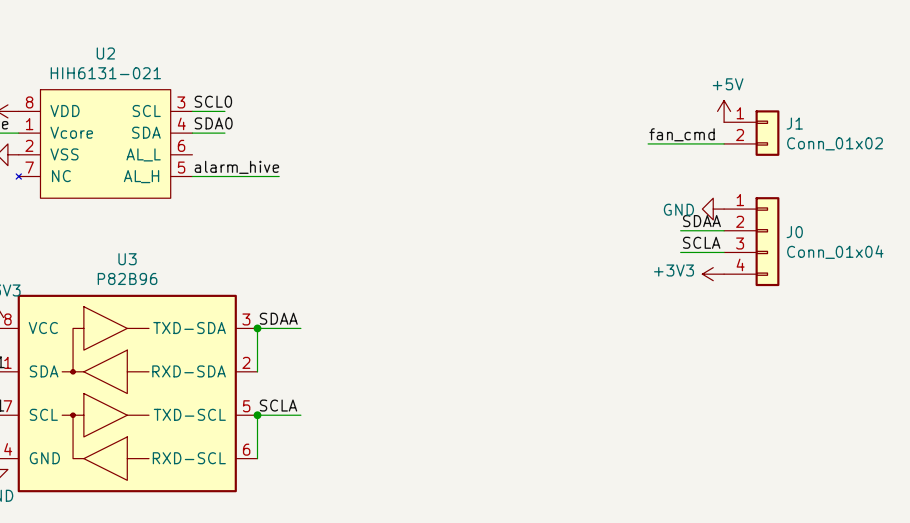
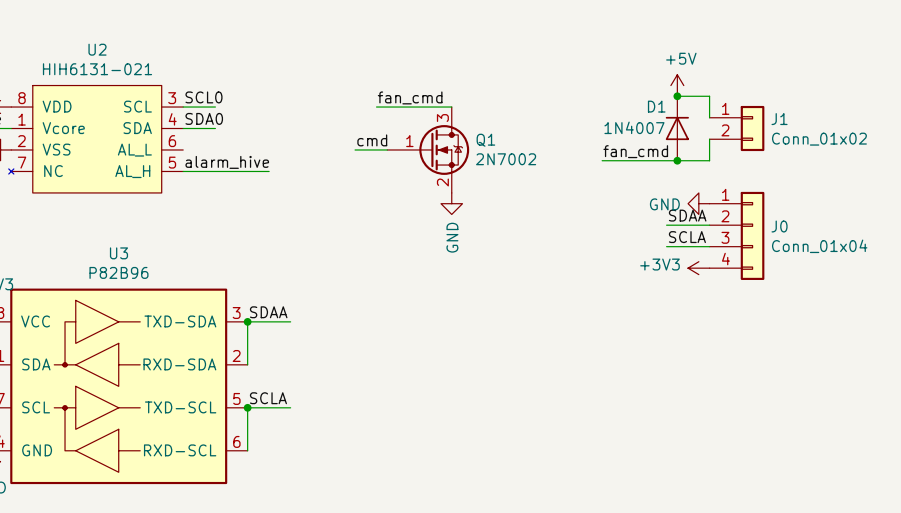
wire: none -> (677, 96) (709, 96) (709, 117)
junction: none -> (677, 96)
label: none -> fan_cmd (410, 97)
wire: none -> (376, 107) (451, 107)
power symbol position: +5V (724, 111) -> +5V (677, 85)
D1: none -> 1N4007 (677, 128)
label position: fan_cmd (682, 134) -> fan_cmd (635, 151)
wire: (648, 143) (724, 143) -> (602, 160) (709, 160) (709, 139)
label: none -> cmd (372, 140)
wire: none -> (355, 149) (387, 149)
Q1: none -> 2N7002 (428, 149)
junction: none -> (677, 160)
power symbol: none -> GND (451, 203)

